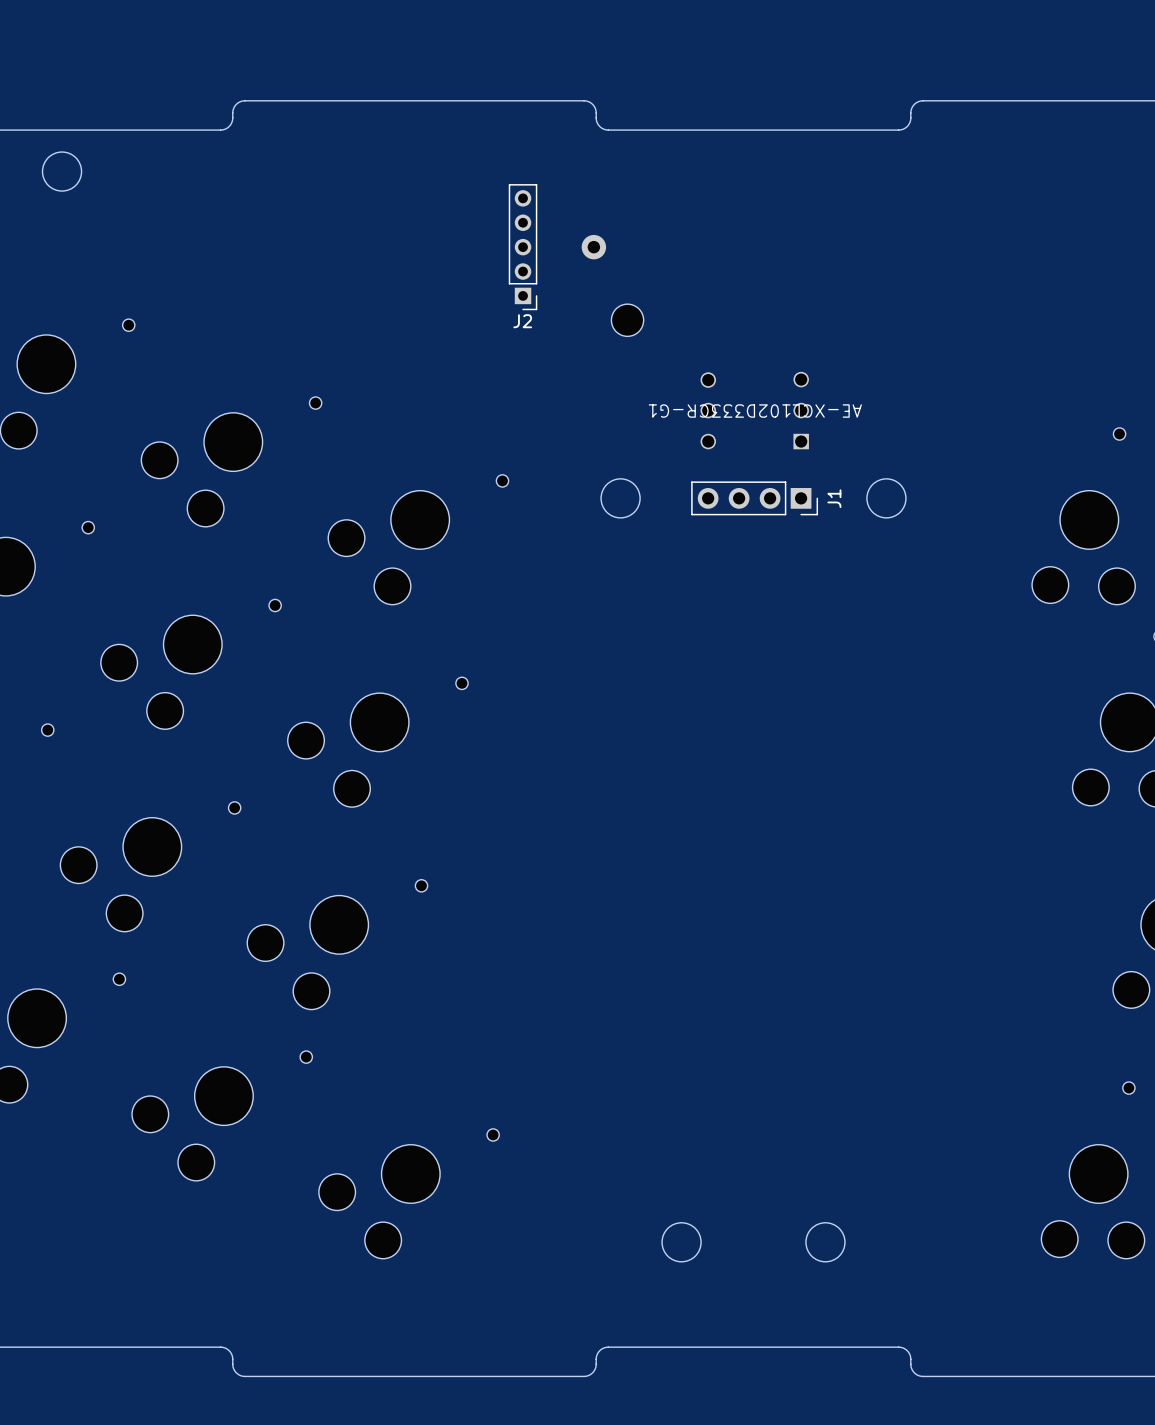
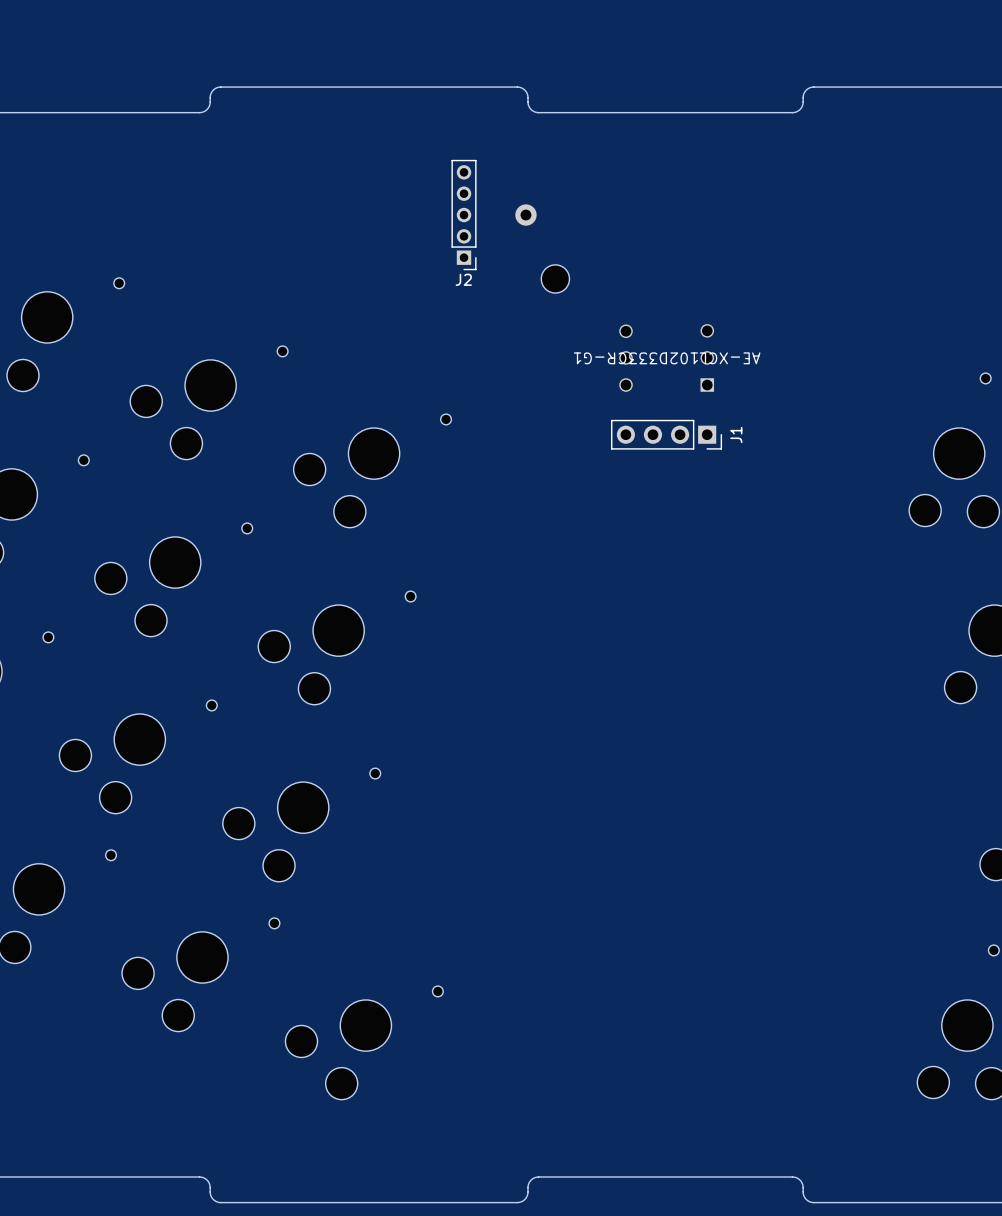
drawing: [42, 151, 82, 192] -> none
drawing: [601, 478, 641, 518] -> none
drawing: [866, 478, 907, 518] -> none
drawing: [661, 1222, 702, 1262] -> none
drawing: [805, 1222, 846, 1262] -> none

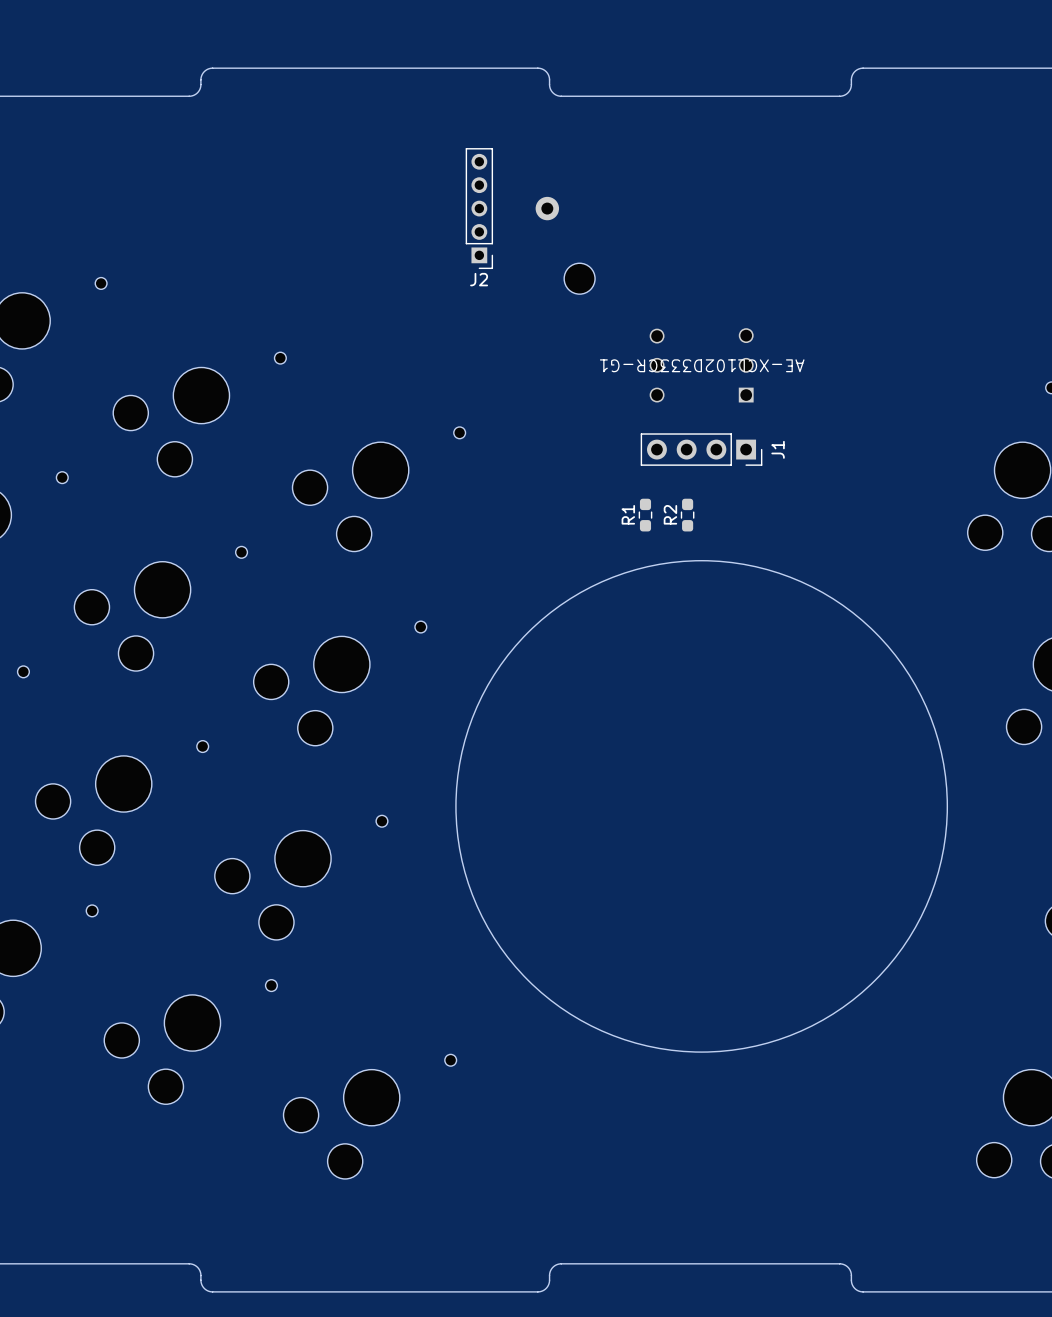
R1: none -> (645, 515)
R2: none -> (687, 515)
round board edge: none -> [455, 560, 948, 1053]

